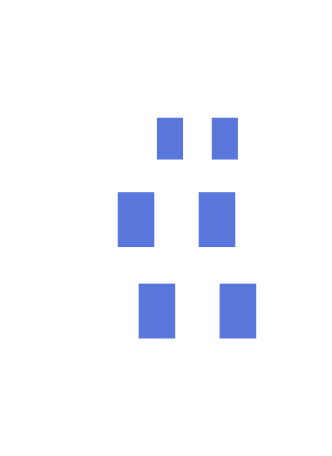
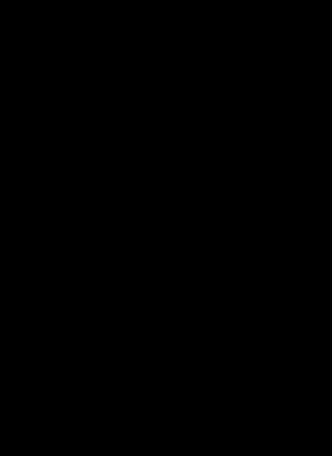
part: (197, 138) -> none
part: (176, 219) -> none
part: (197, 311) -> none

